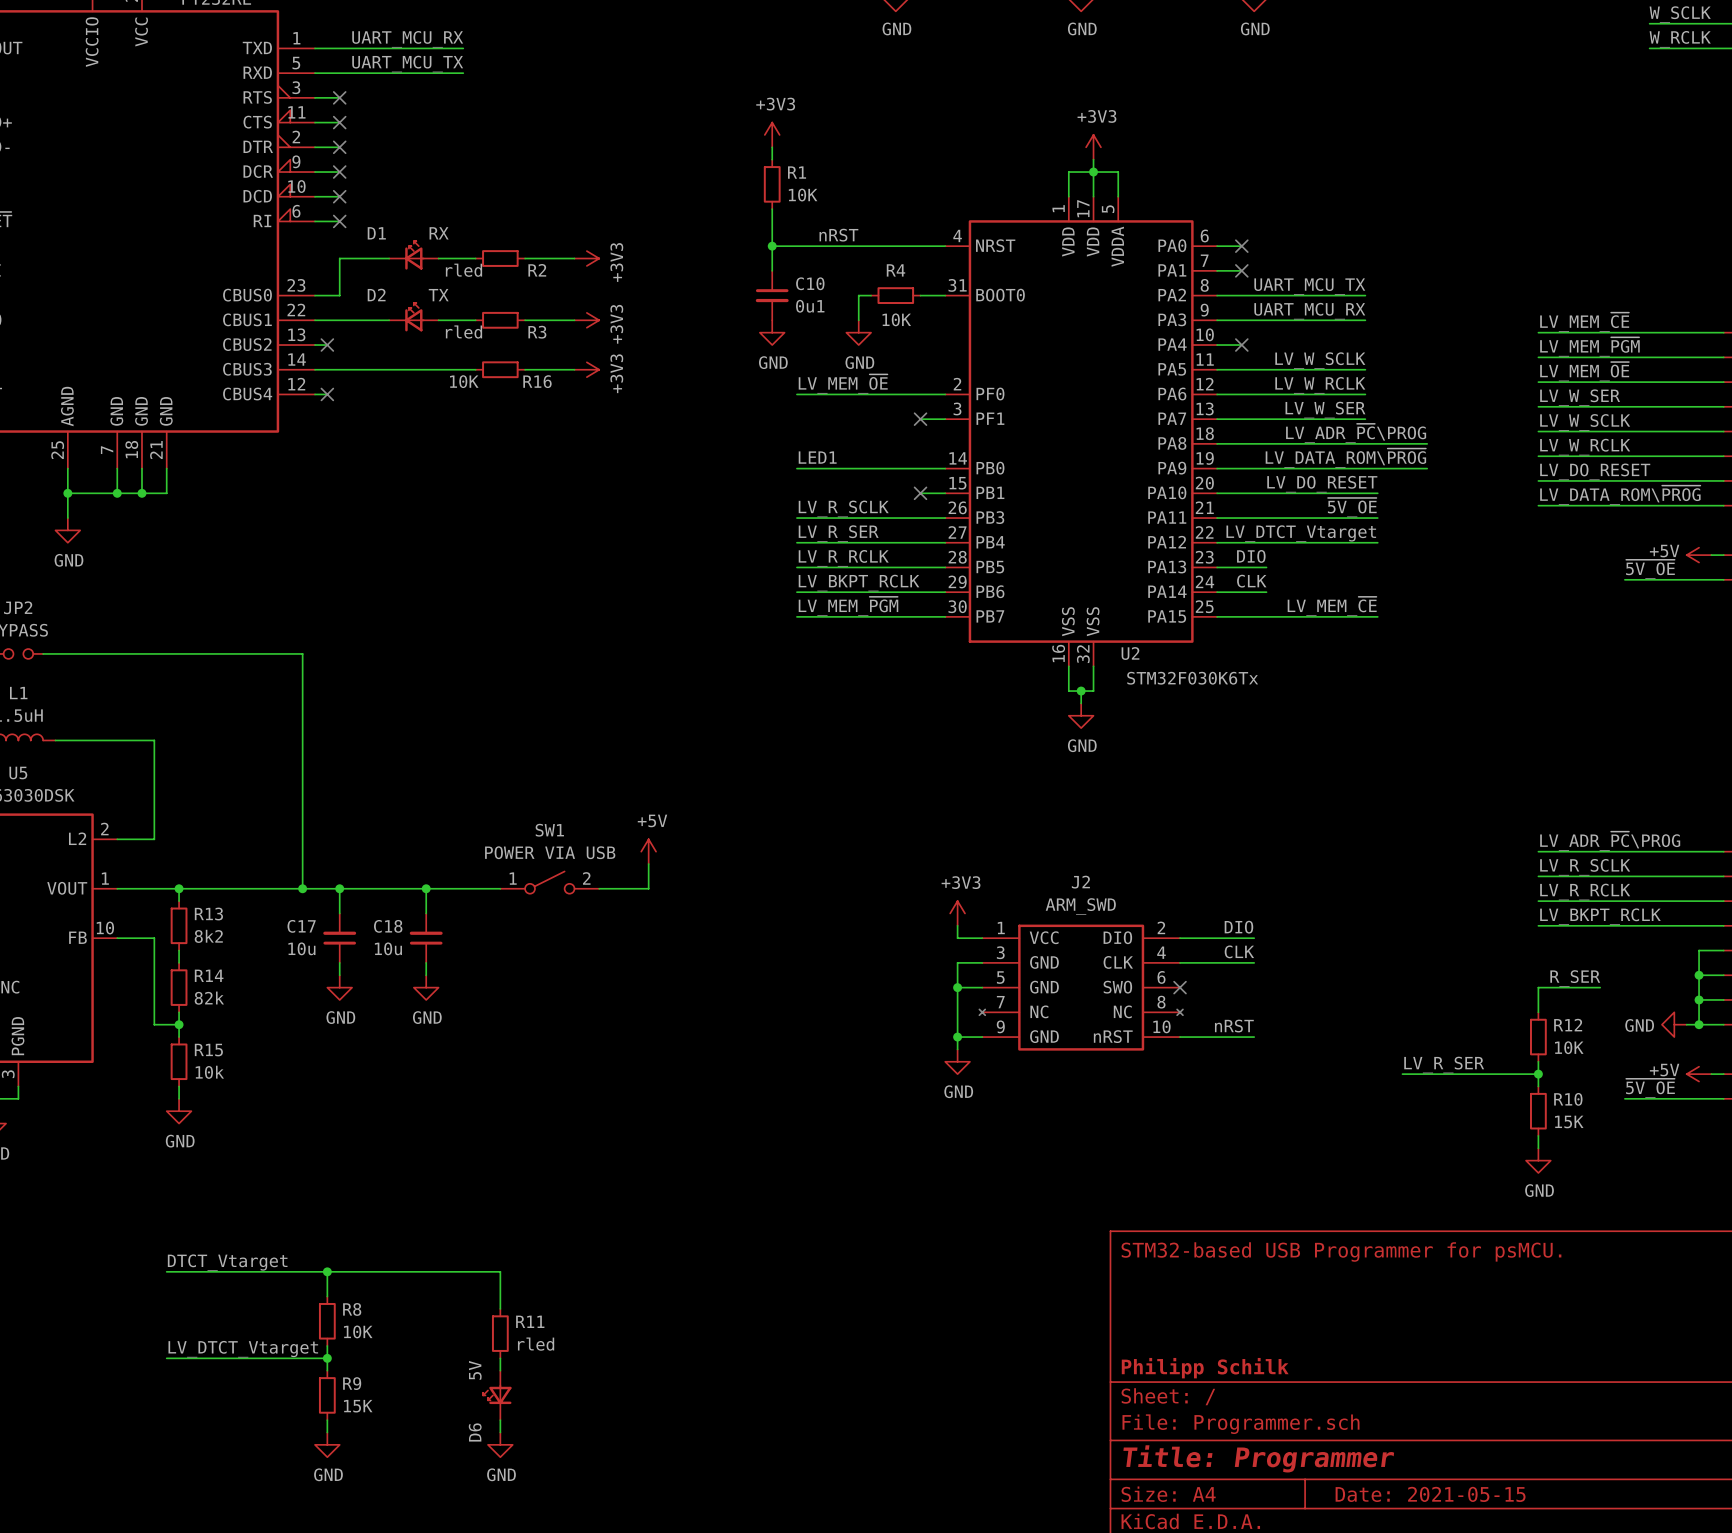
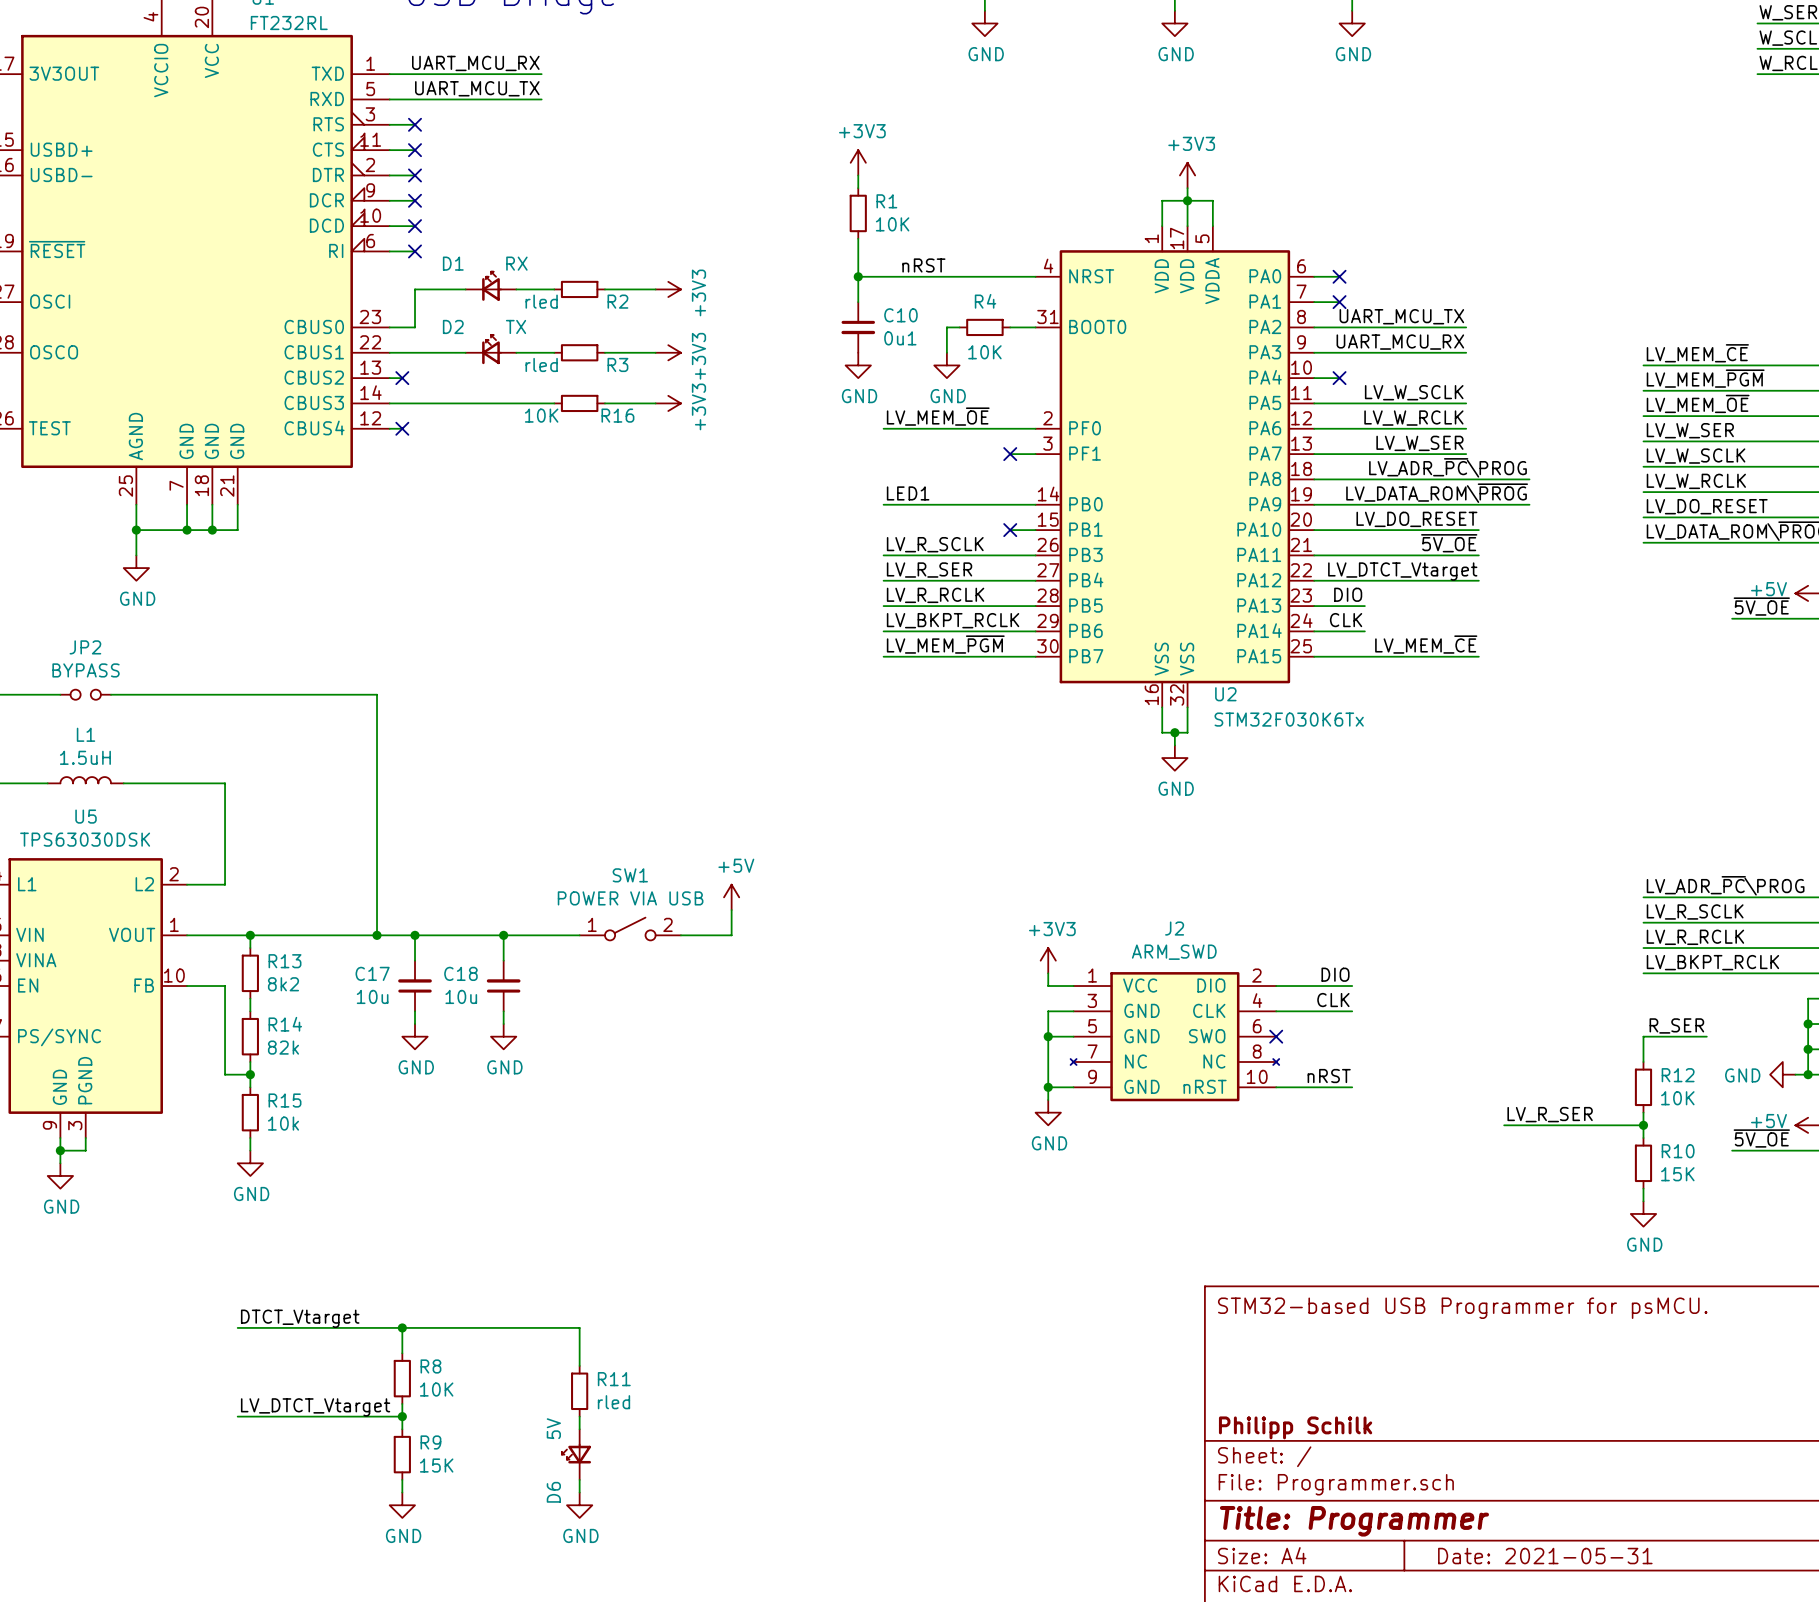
title block: Date: 2021-05-15 (1430, 1494) -> Date: 2021-05-31 (1545, 1556)

